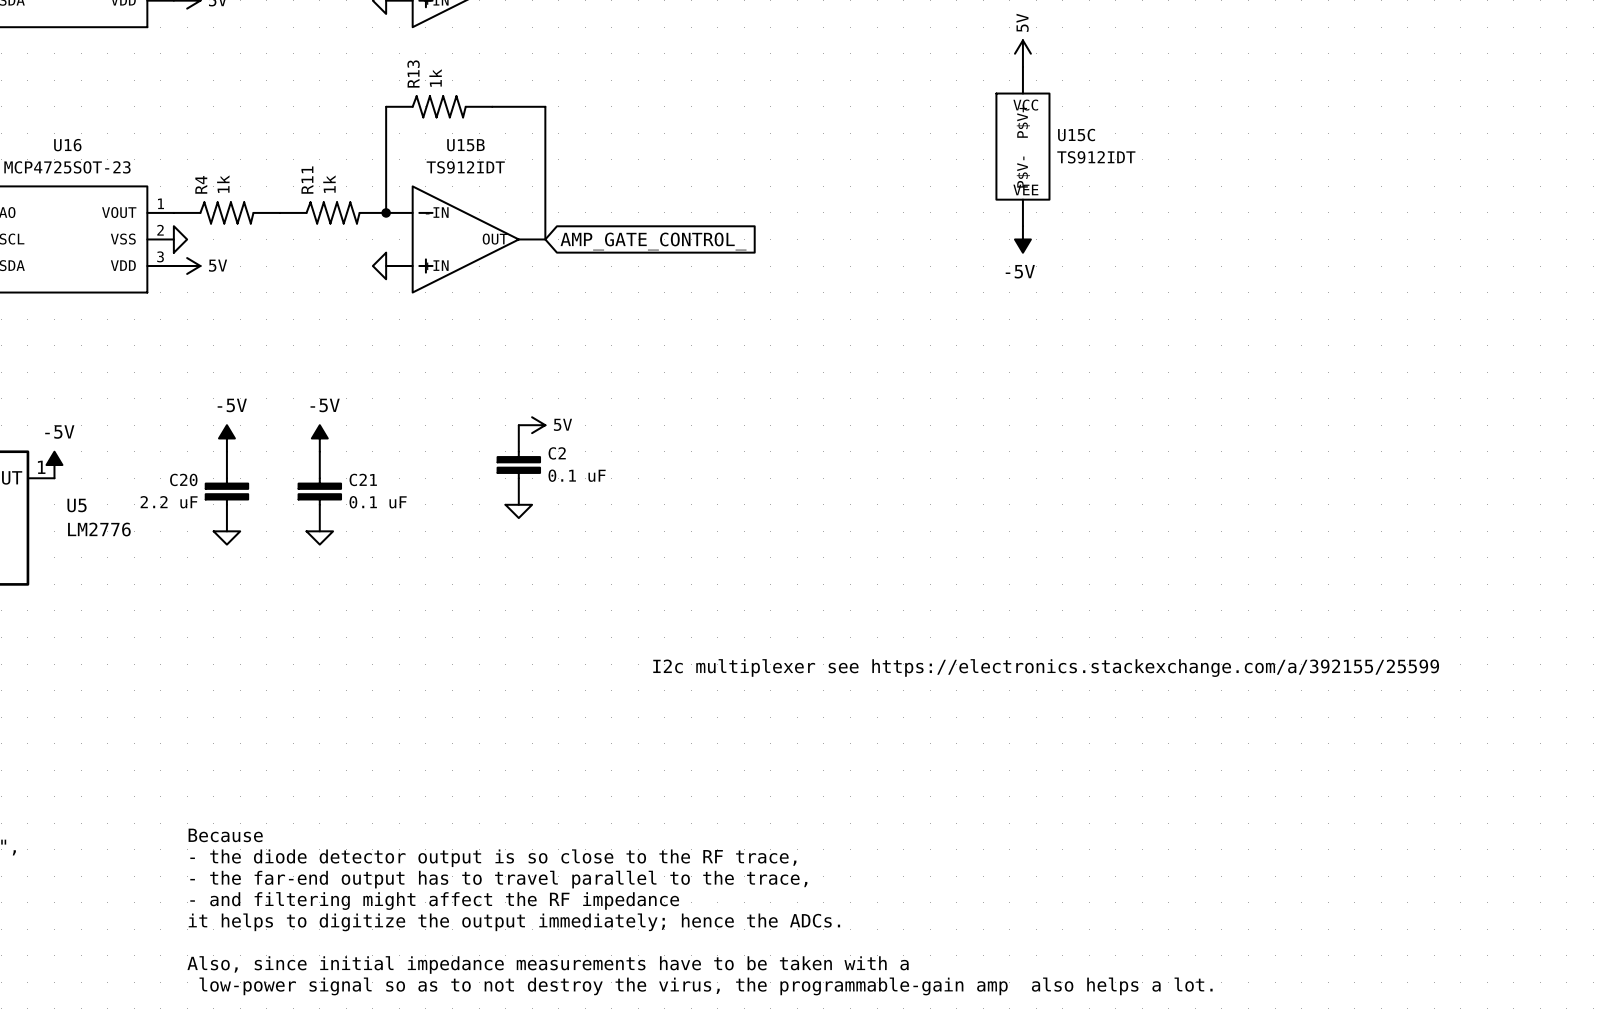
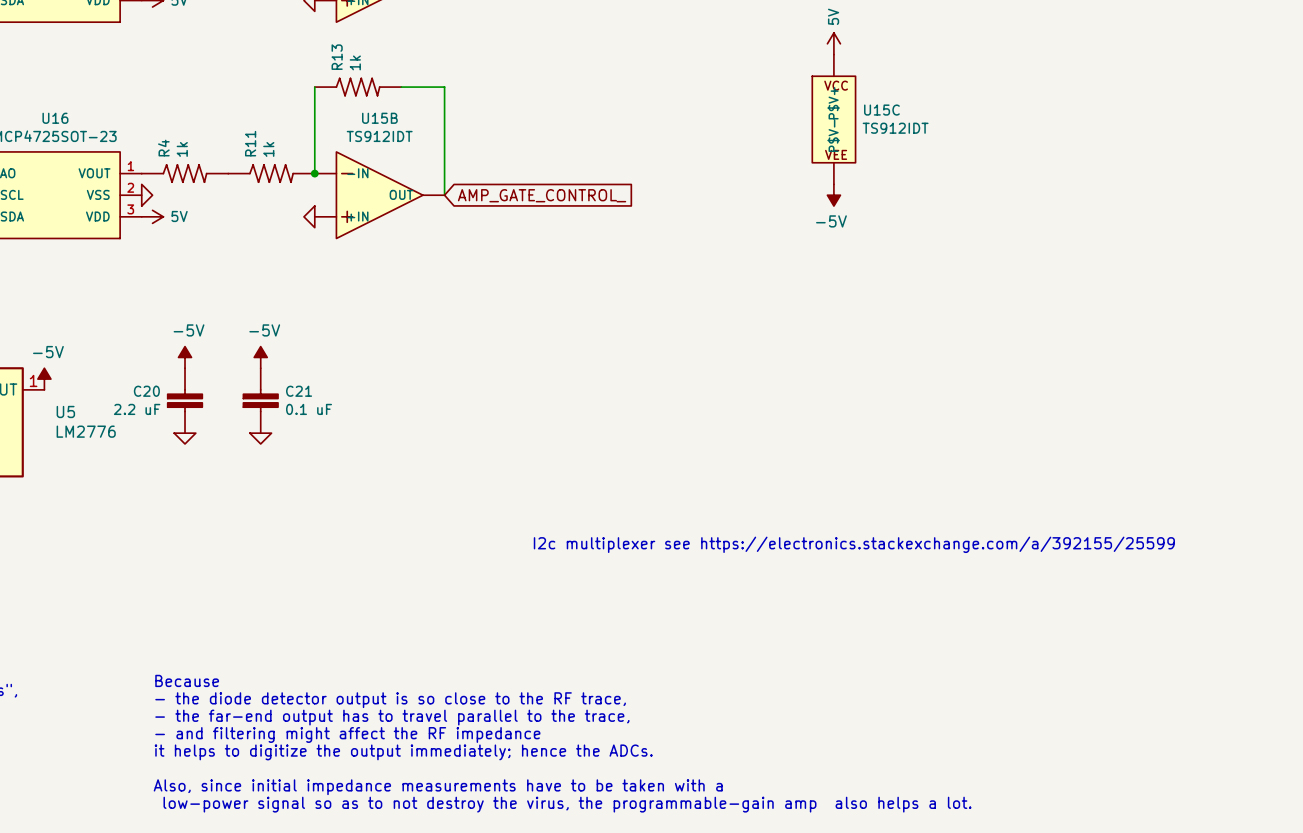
power symbol: 5V (532, 425) -> none
C2: 0.1 uF (518, 465) -> none
power symbol: (518, 511) -> none

